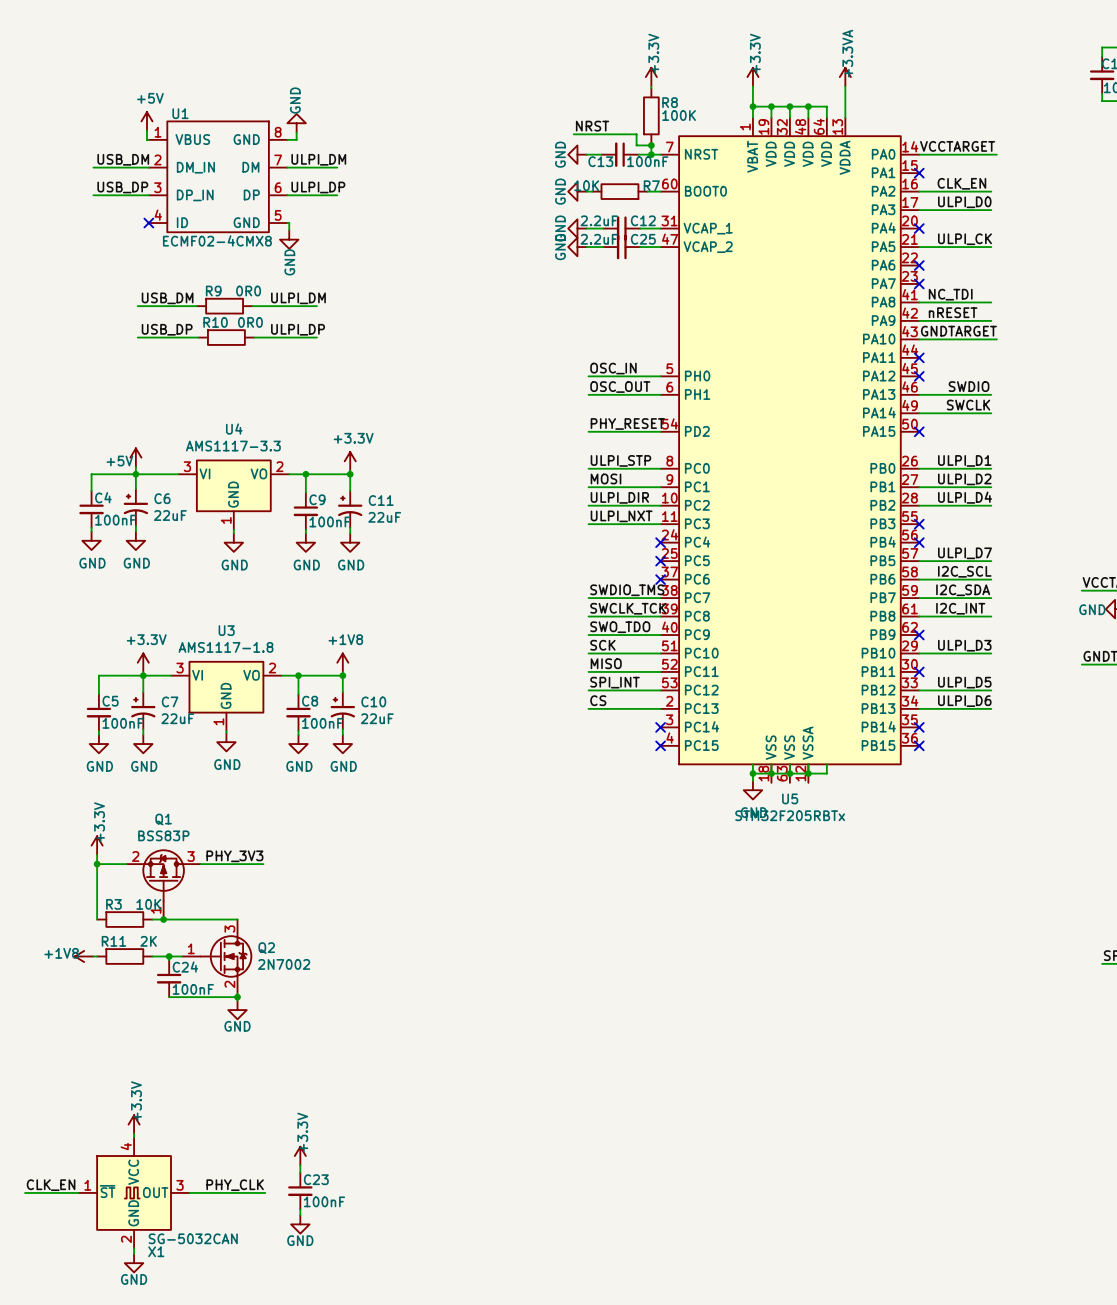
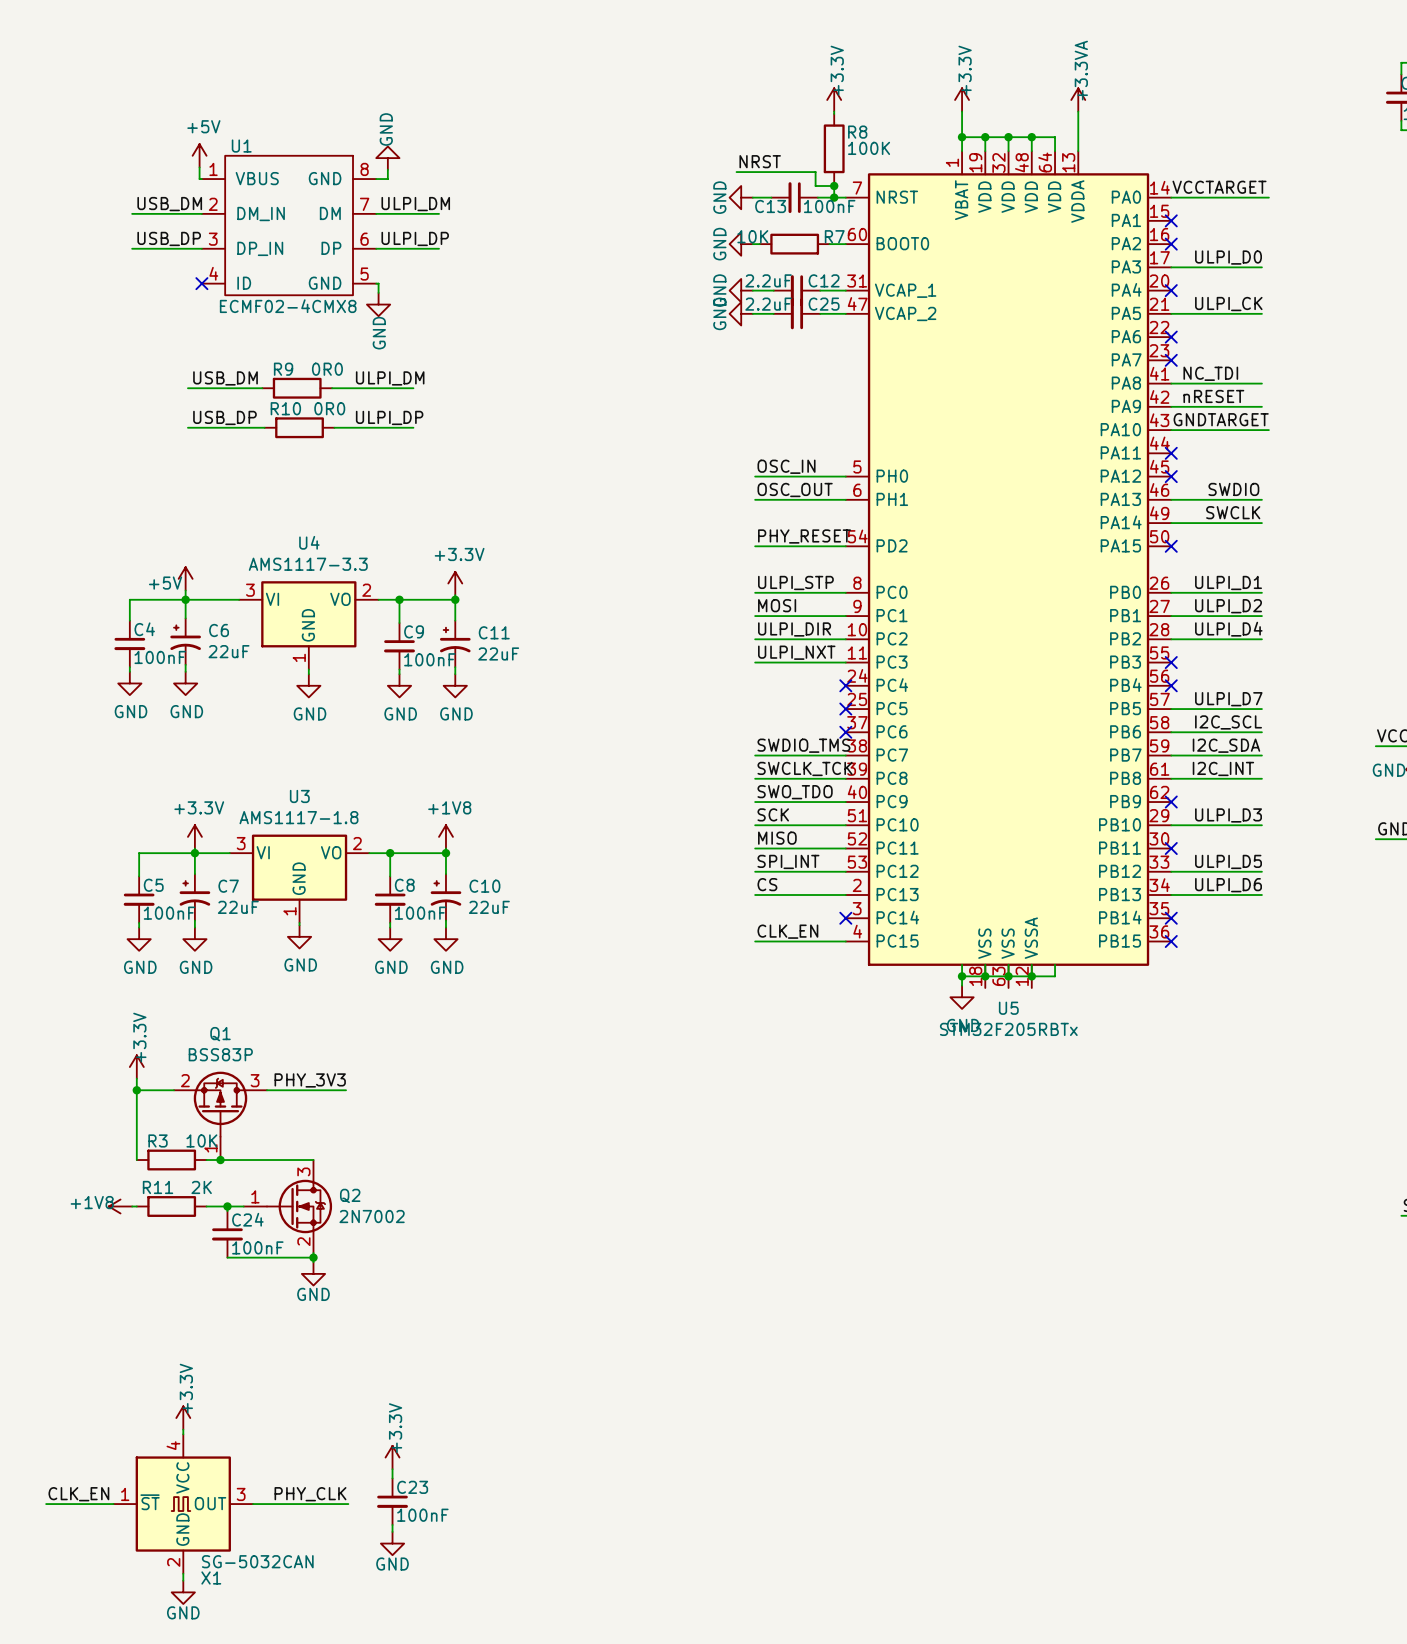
label: CLK_EN (961, 183) -> none
wire: (919, 191) (991, 191) -> none
no-connect mark: none -> (1171, 244)
label: none -> CLK_EN (787, 931)
wire: none -> (755, 941) (845, 941)
no-connect mark: (660, 745) -> none

